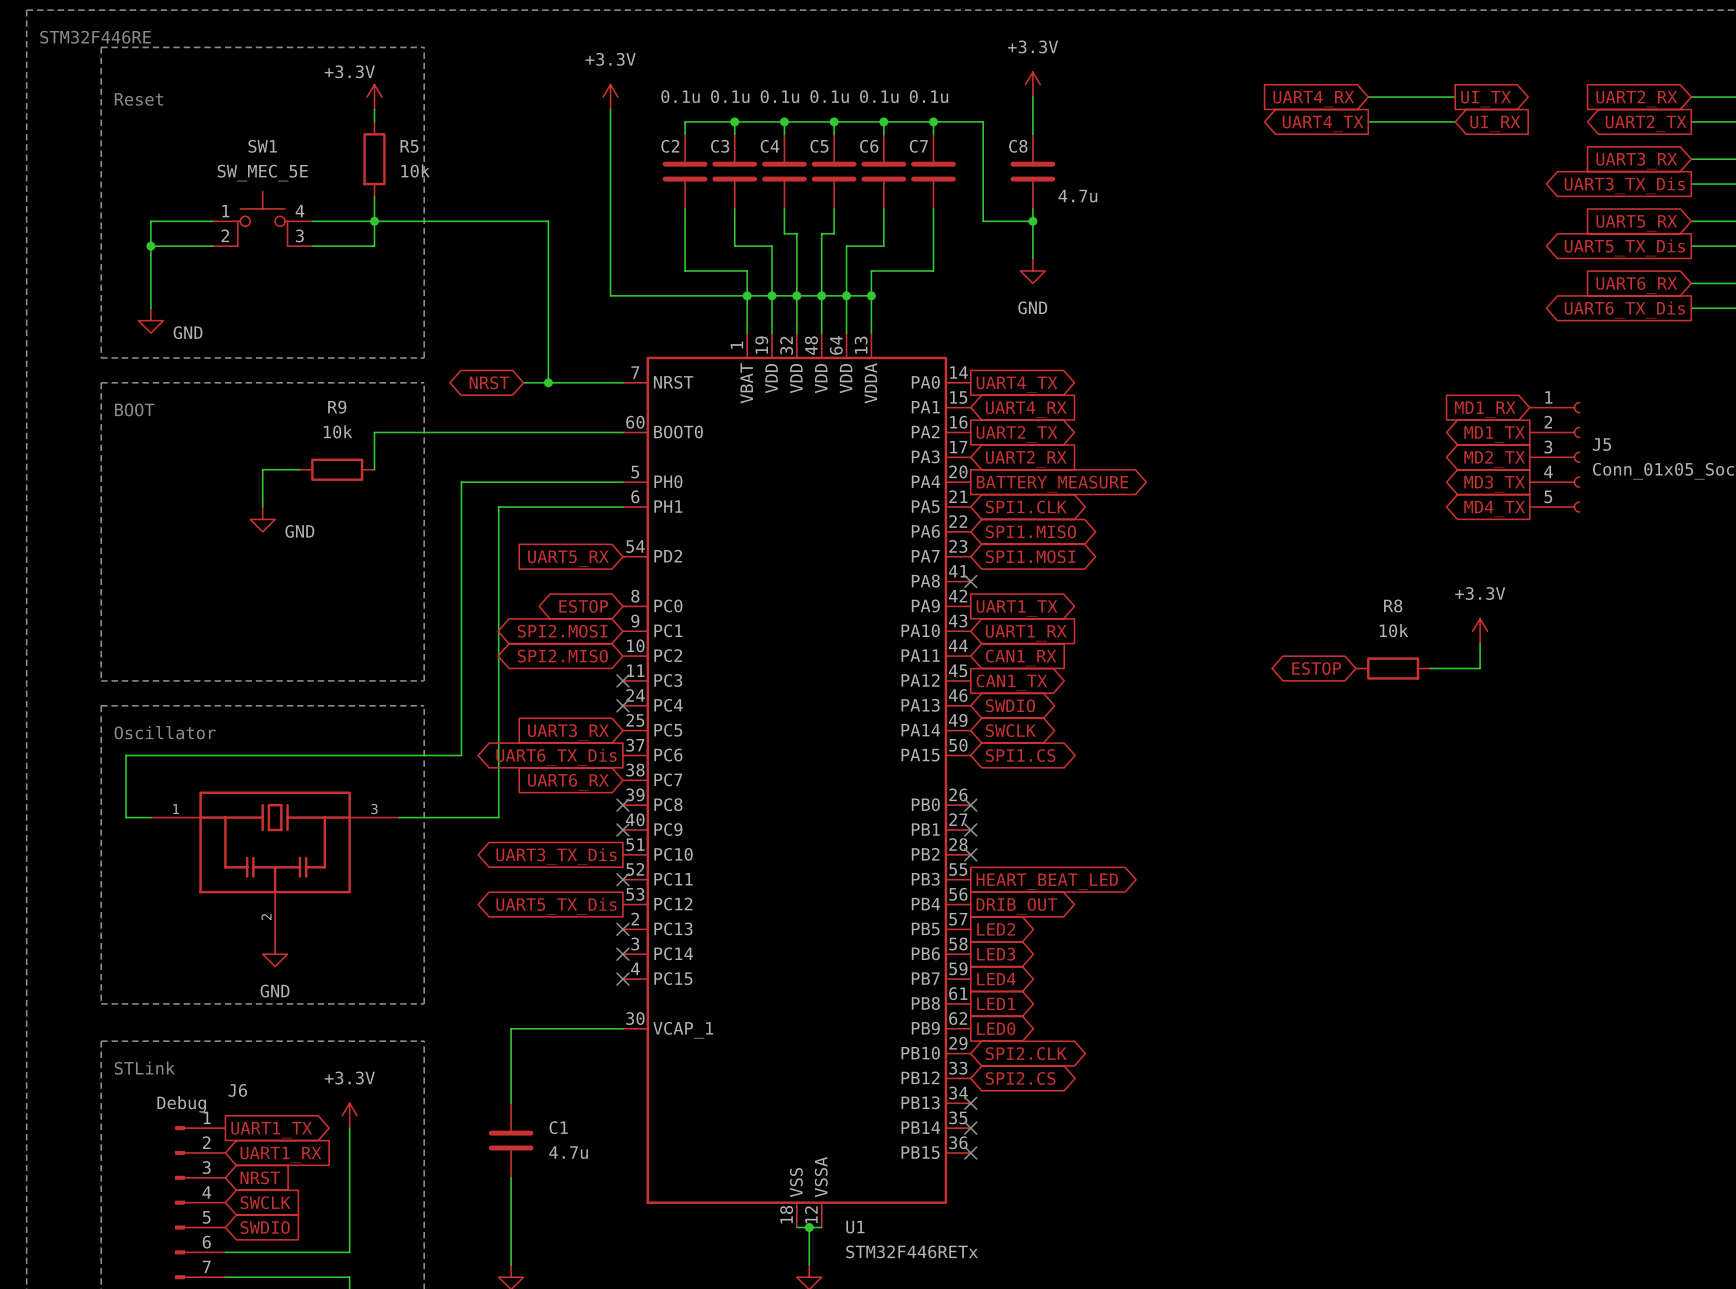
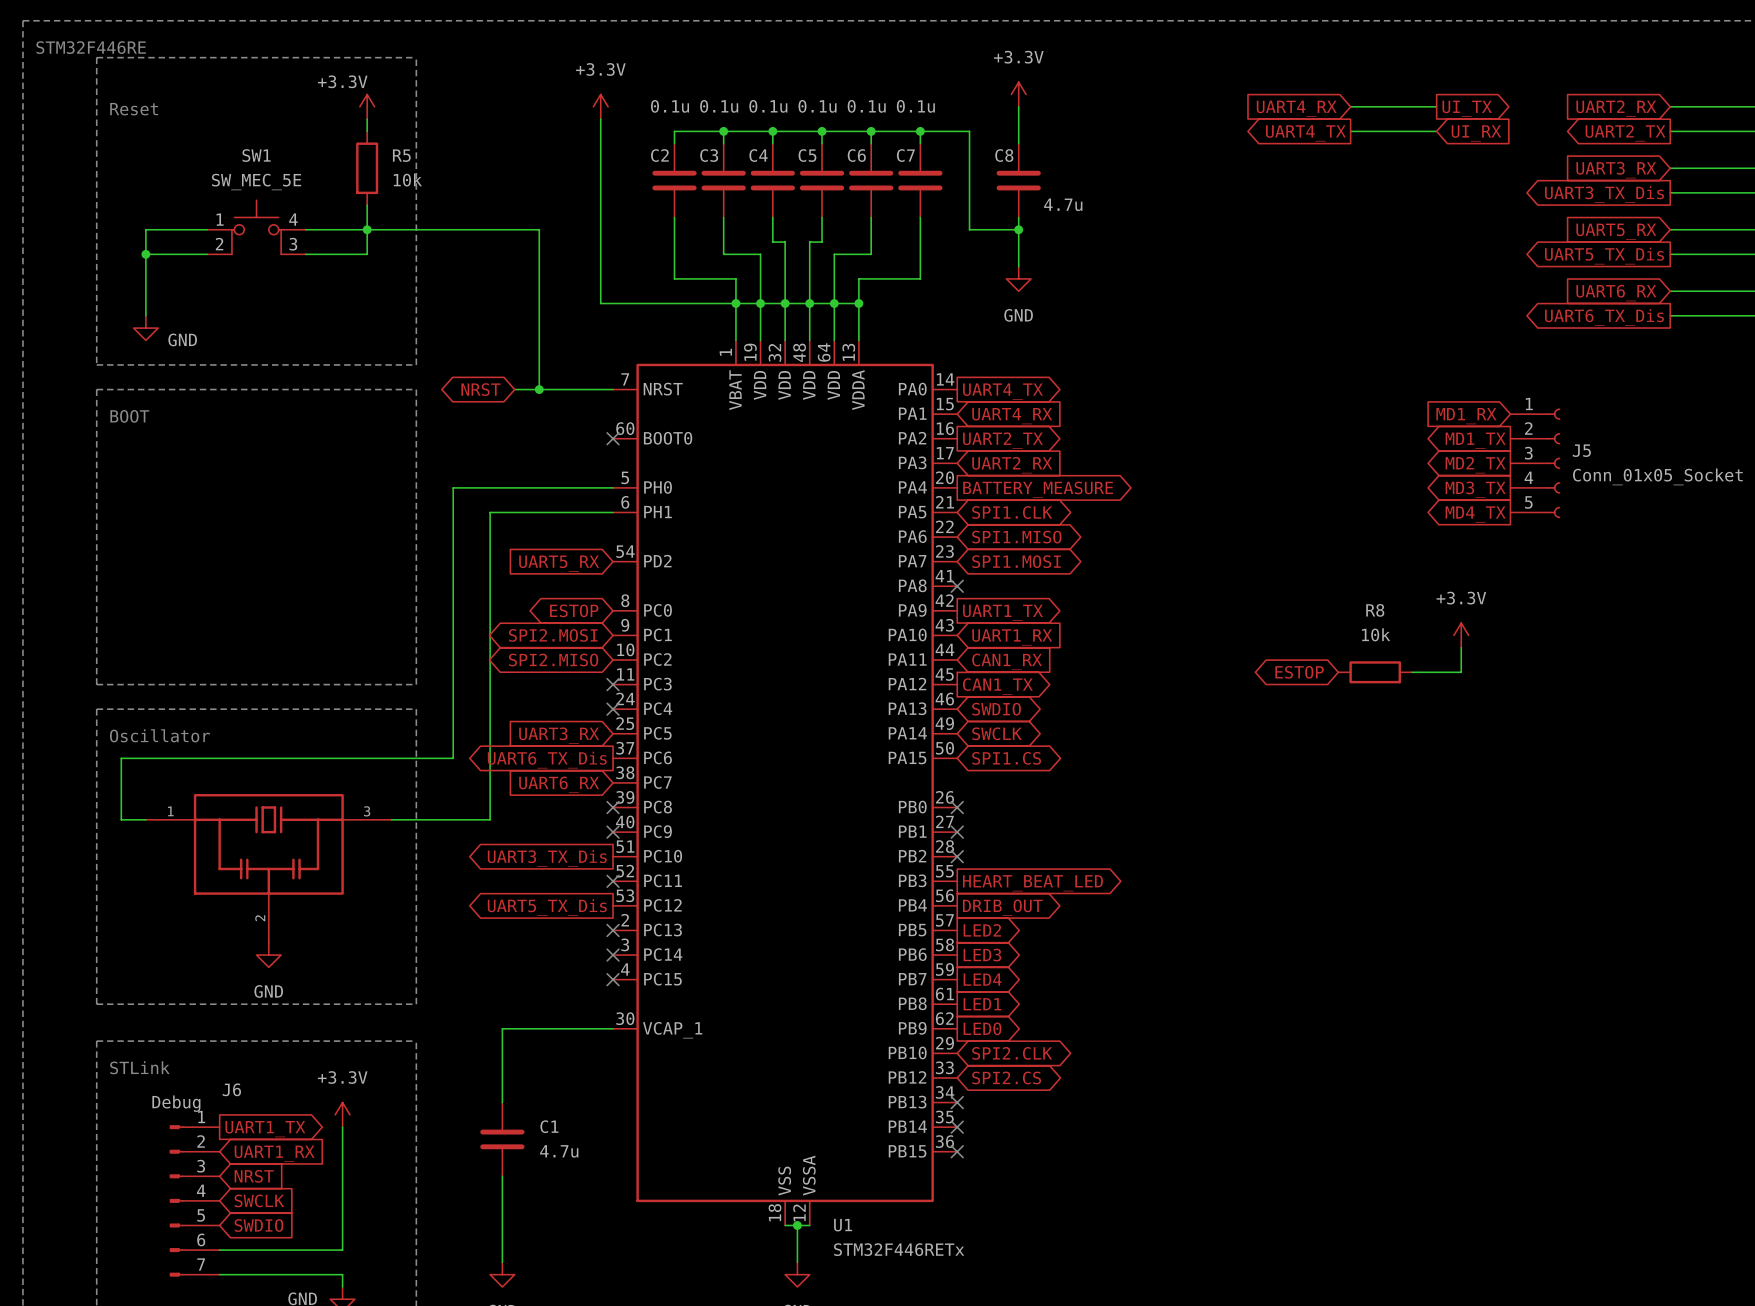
wire: (622, 432) (374, 432) (374, 469) -> none
no-connect mark: none -> (613, 438)
wire: (299, 469) (262, 469) (262, 507) -> none
R9: 10k (337, 469) -> none
power symbol: GND (262, 519) -> none

